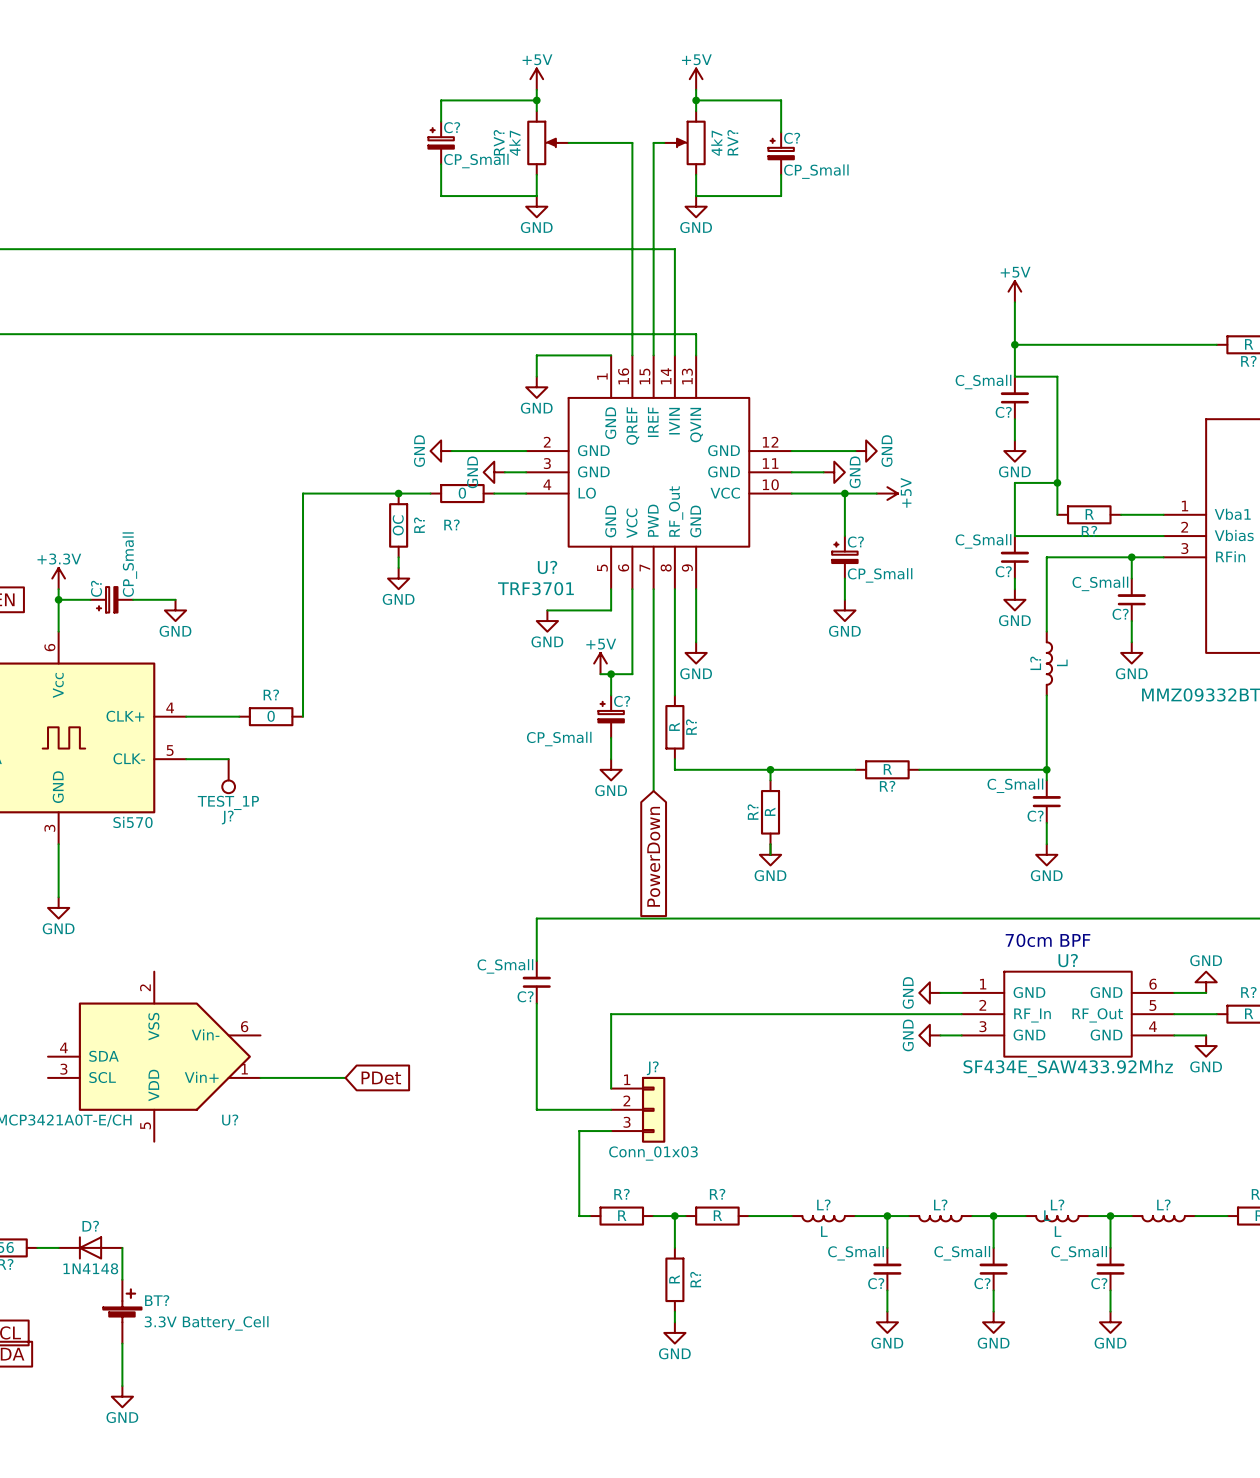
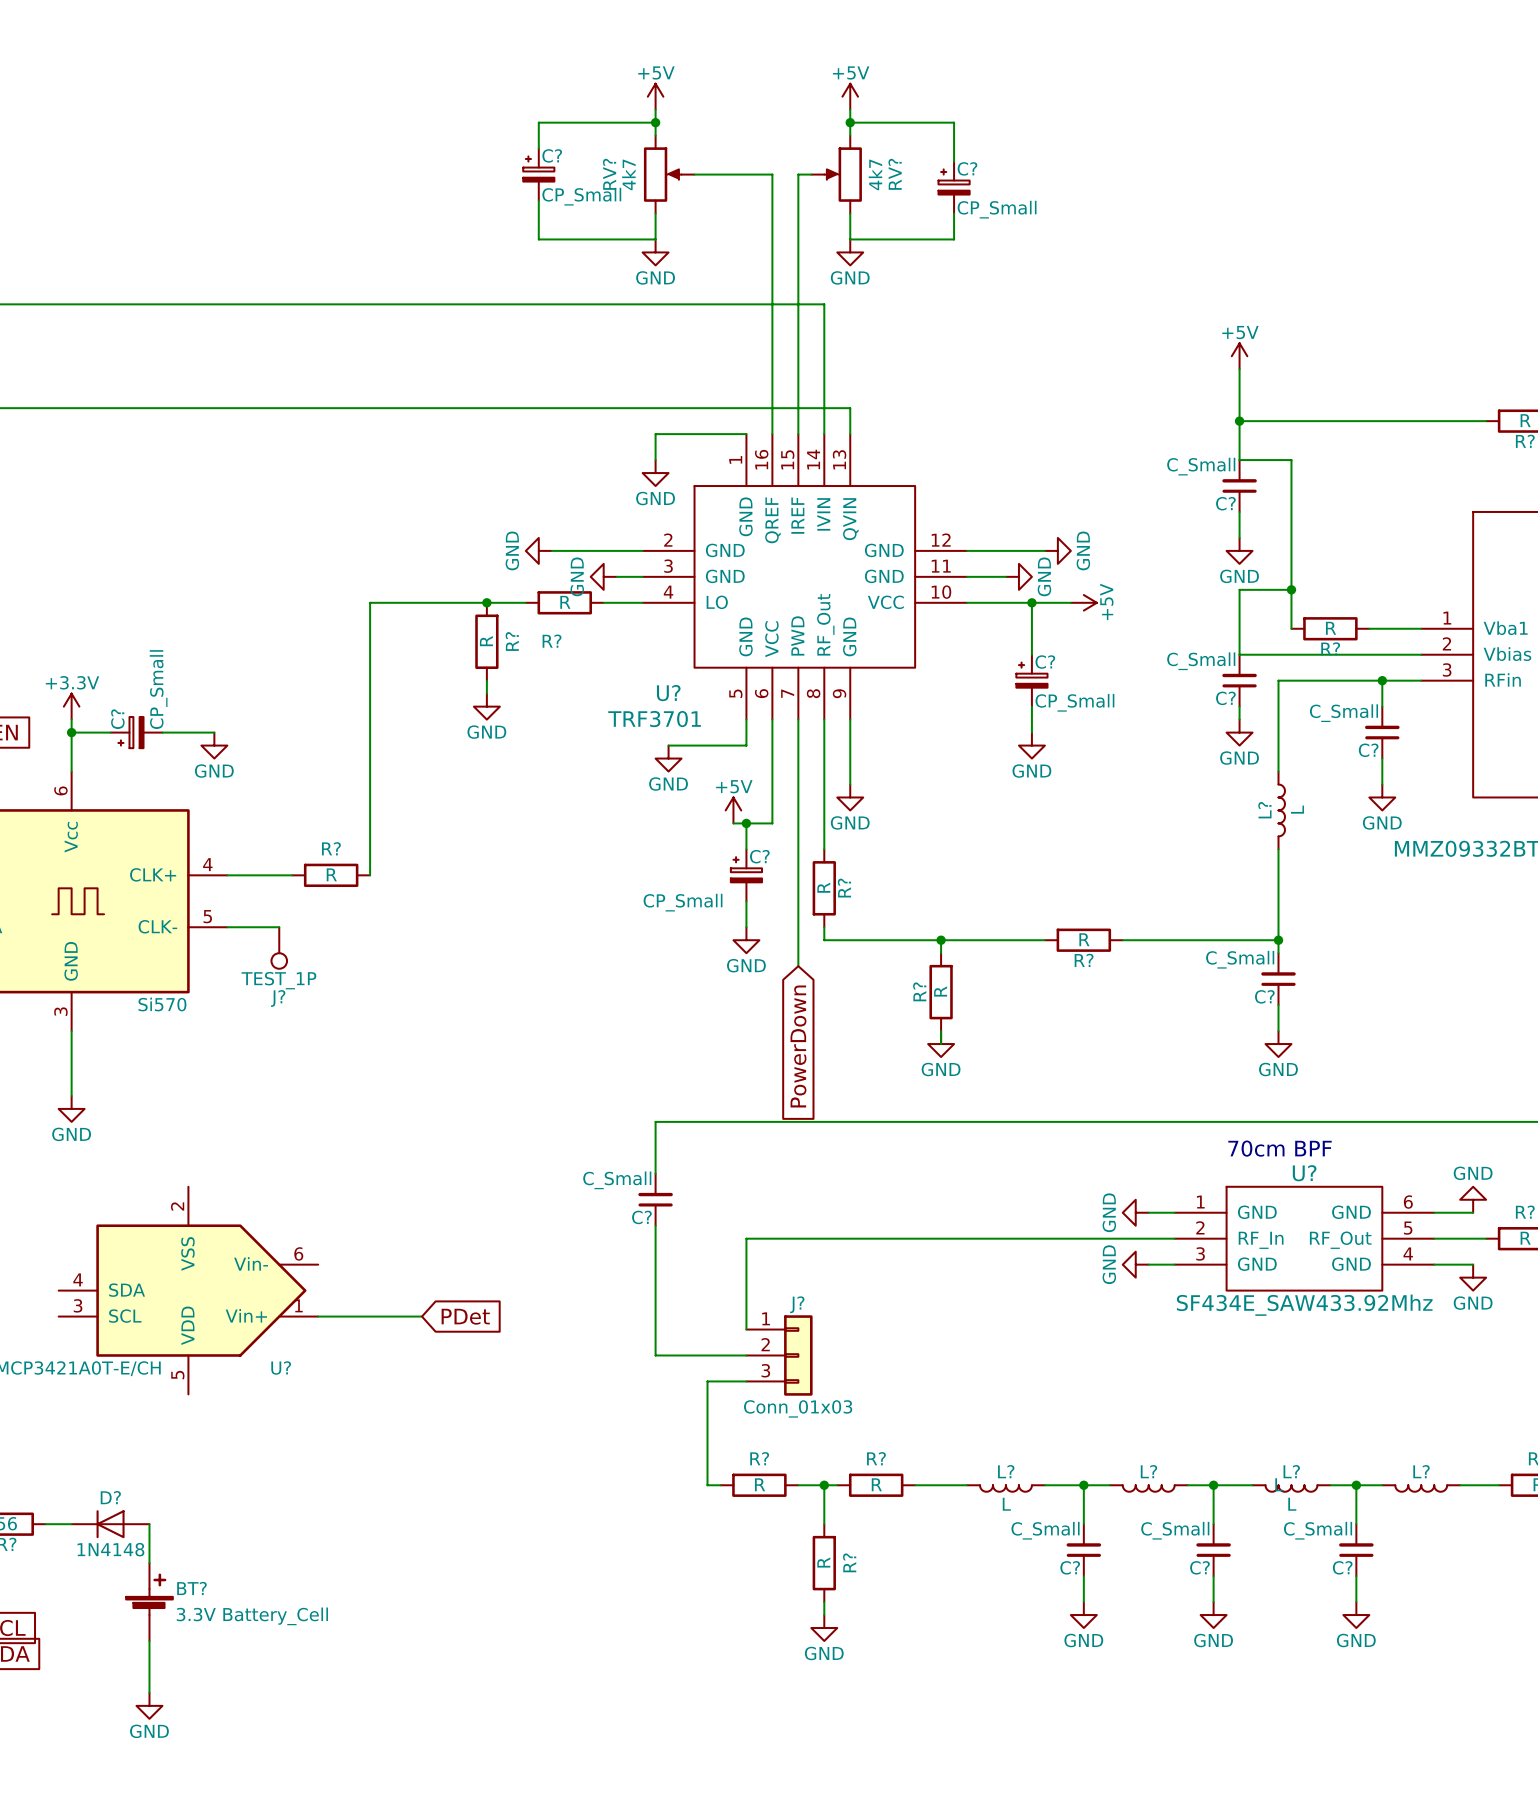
R? value: 0 (462, 493) -> R (565, 602)
R? value: OC (398, 525) -> R (486, 641)
R? value: 0 (271, 716) -> R (331, 874)

